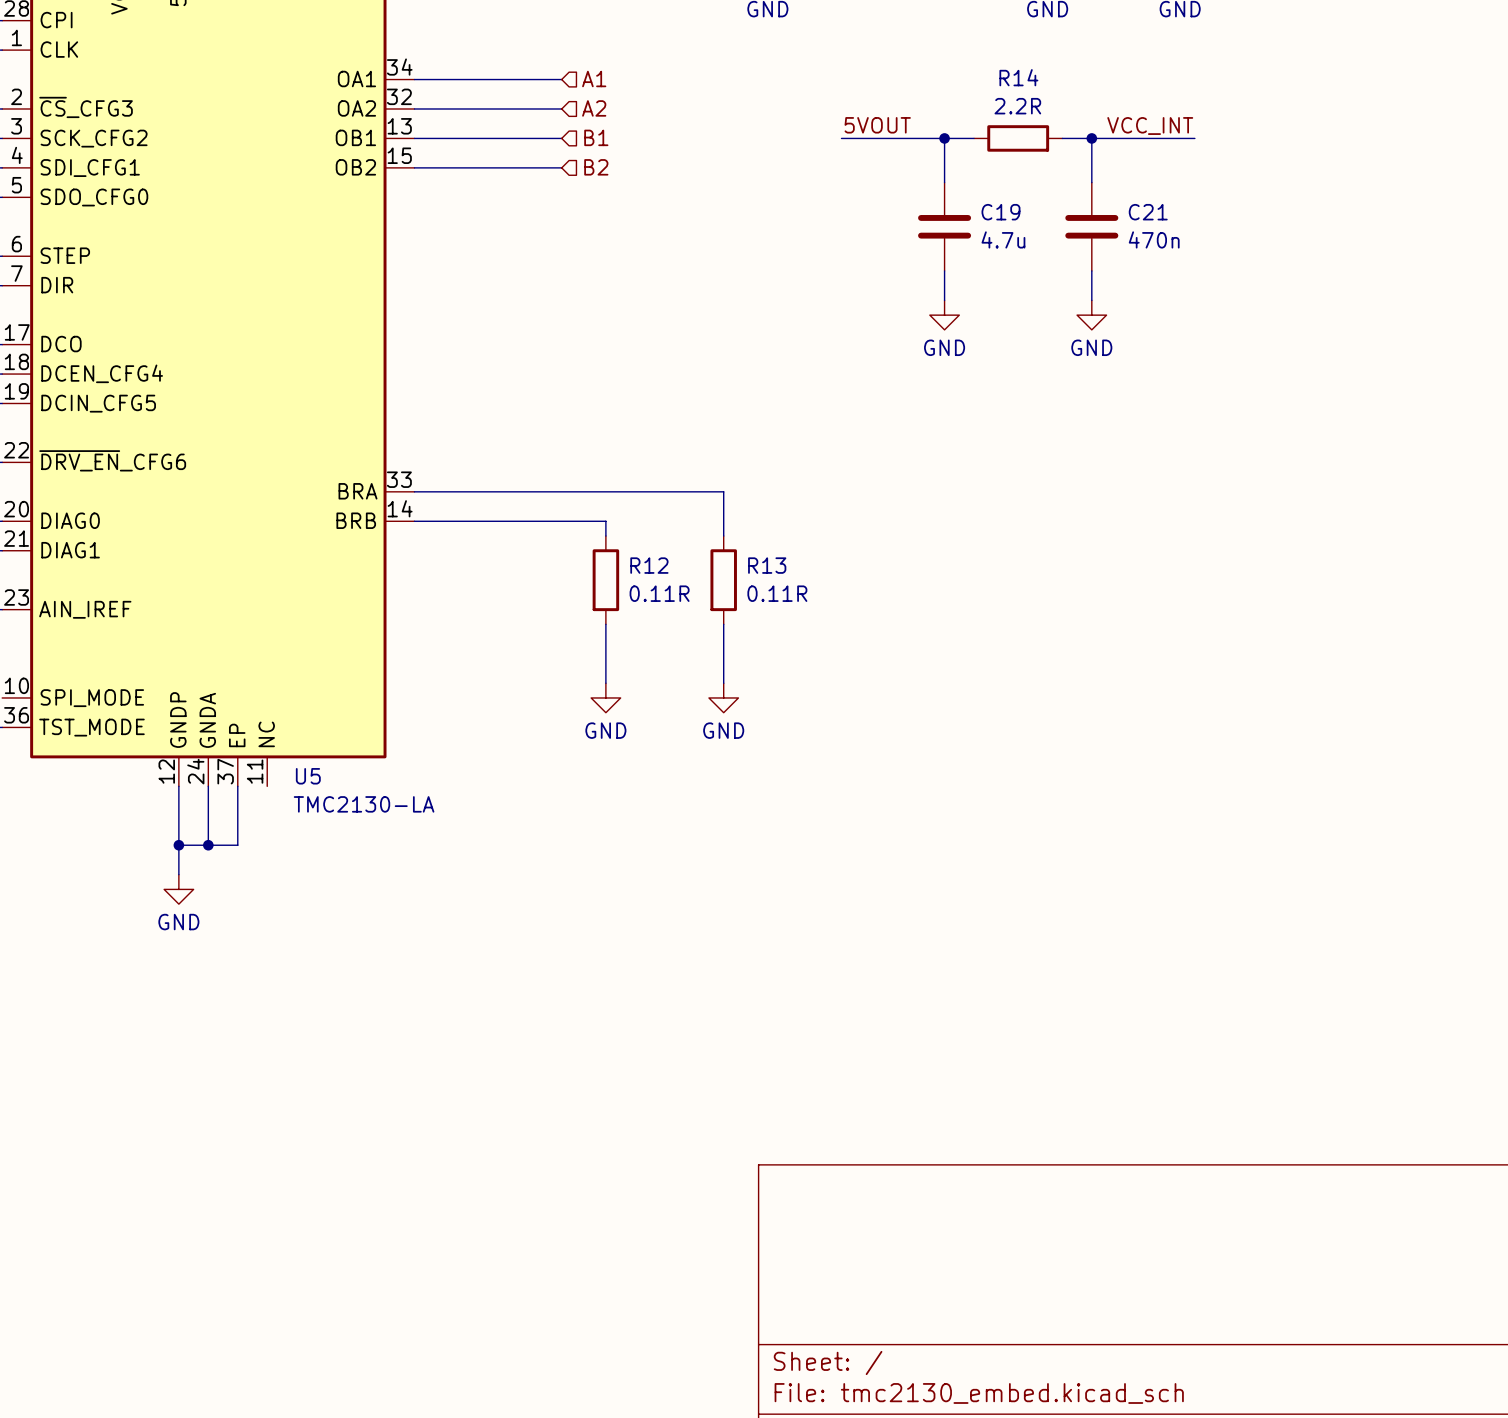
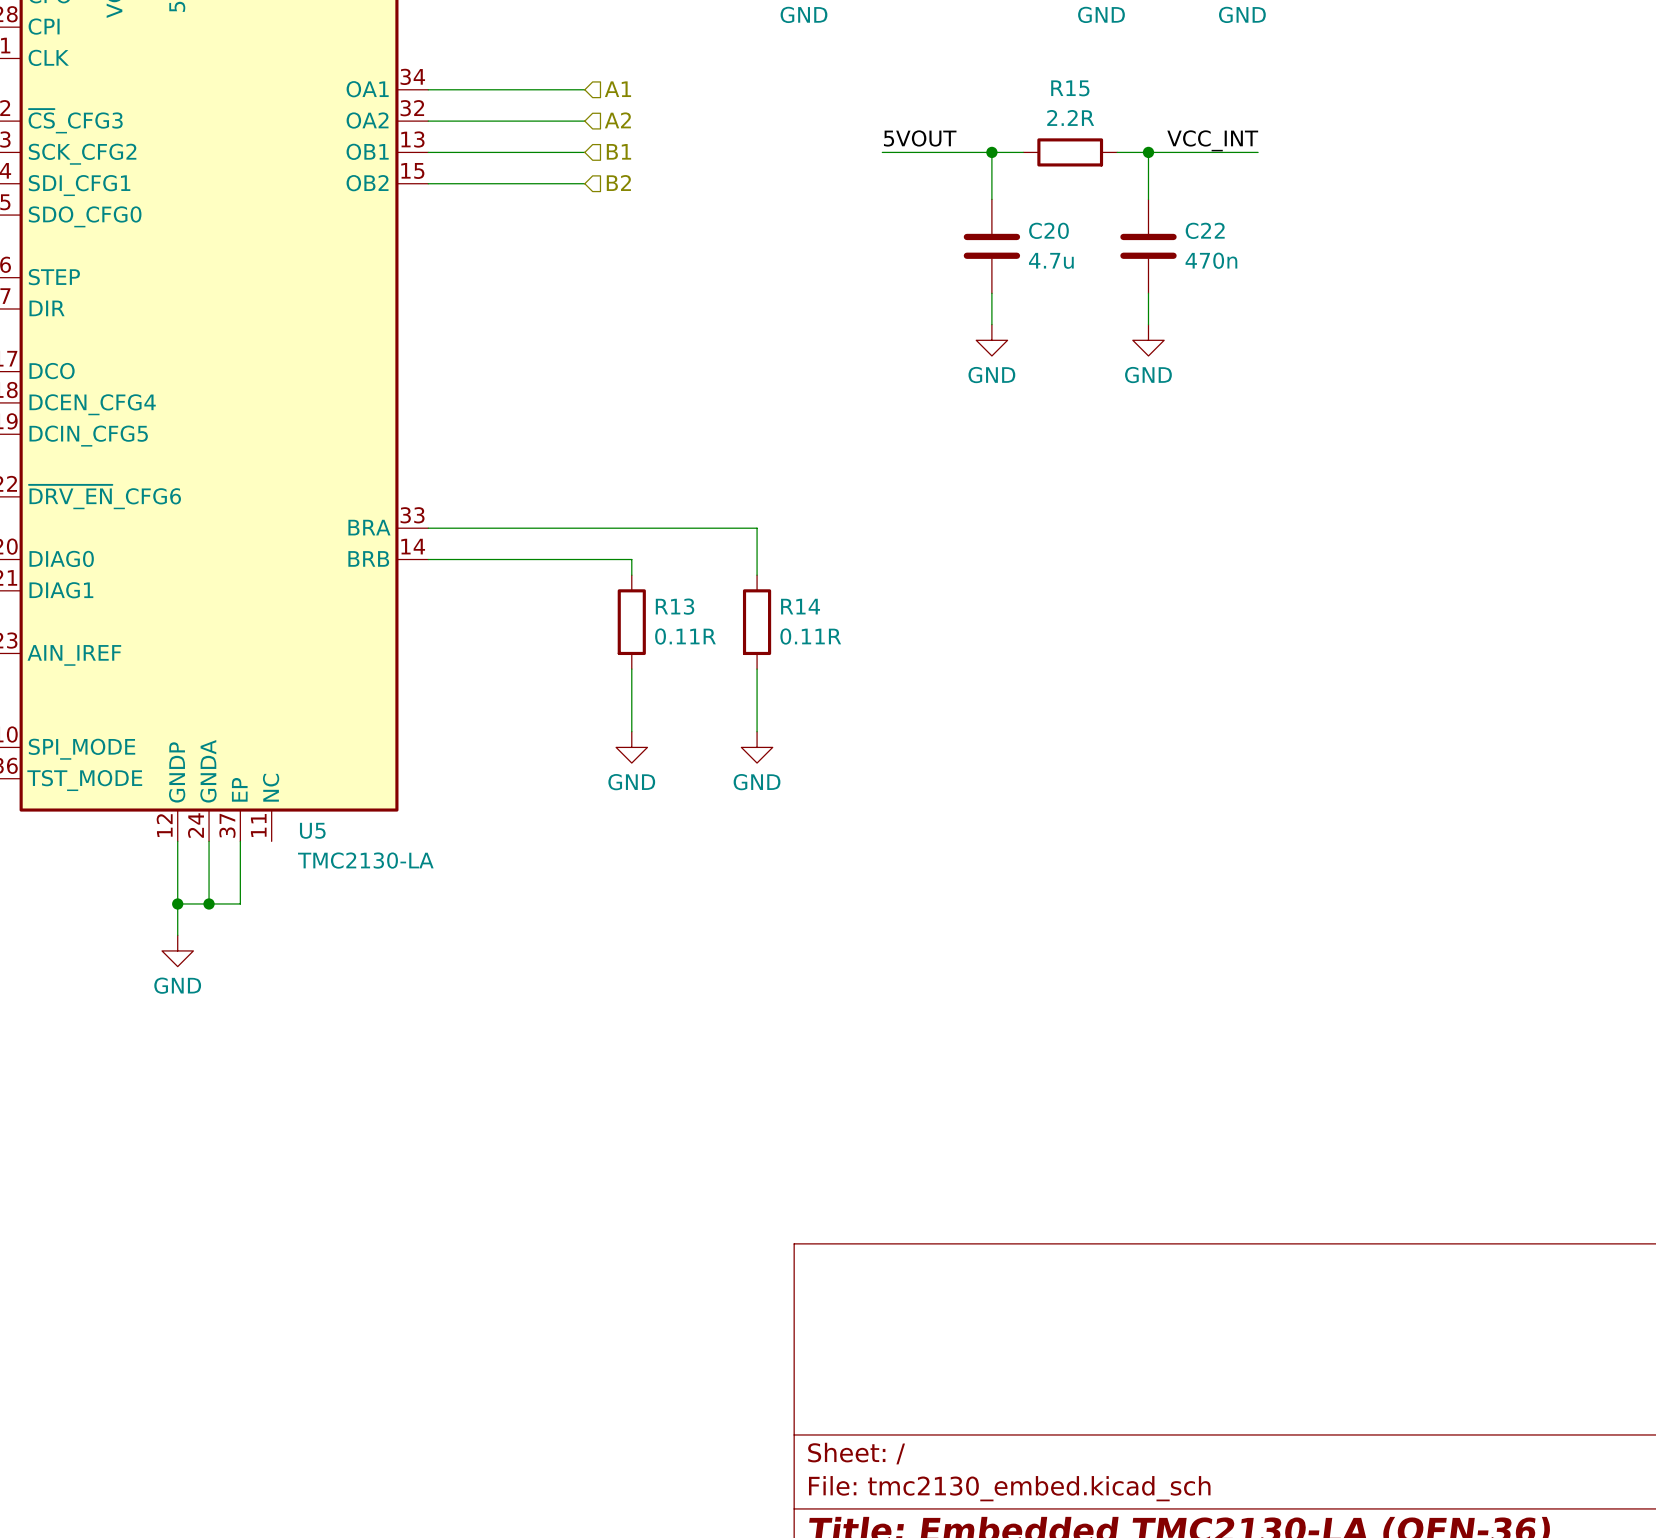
R14 name: R14 (1018, 77) -> R15 (1070, 88)
C19 name: C19 (1000, 212) -> C20 (1048, 230)
C21 name: C21 (1148, 212) -> C22 (1205, 230)
R12 name: R12 (649, 565) -> R13 (675, 606)
R13 name: R13 (767, 565) -> R14 (800, 606)

